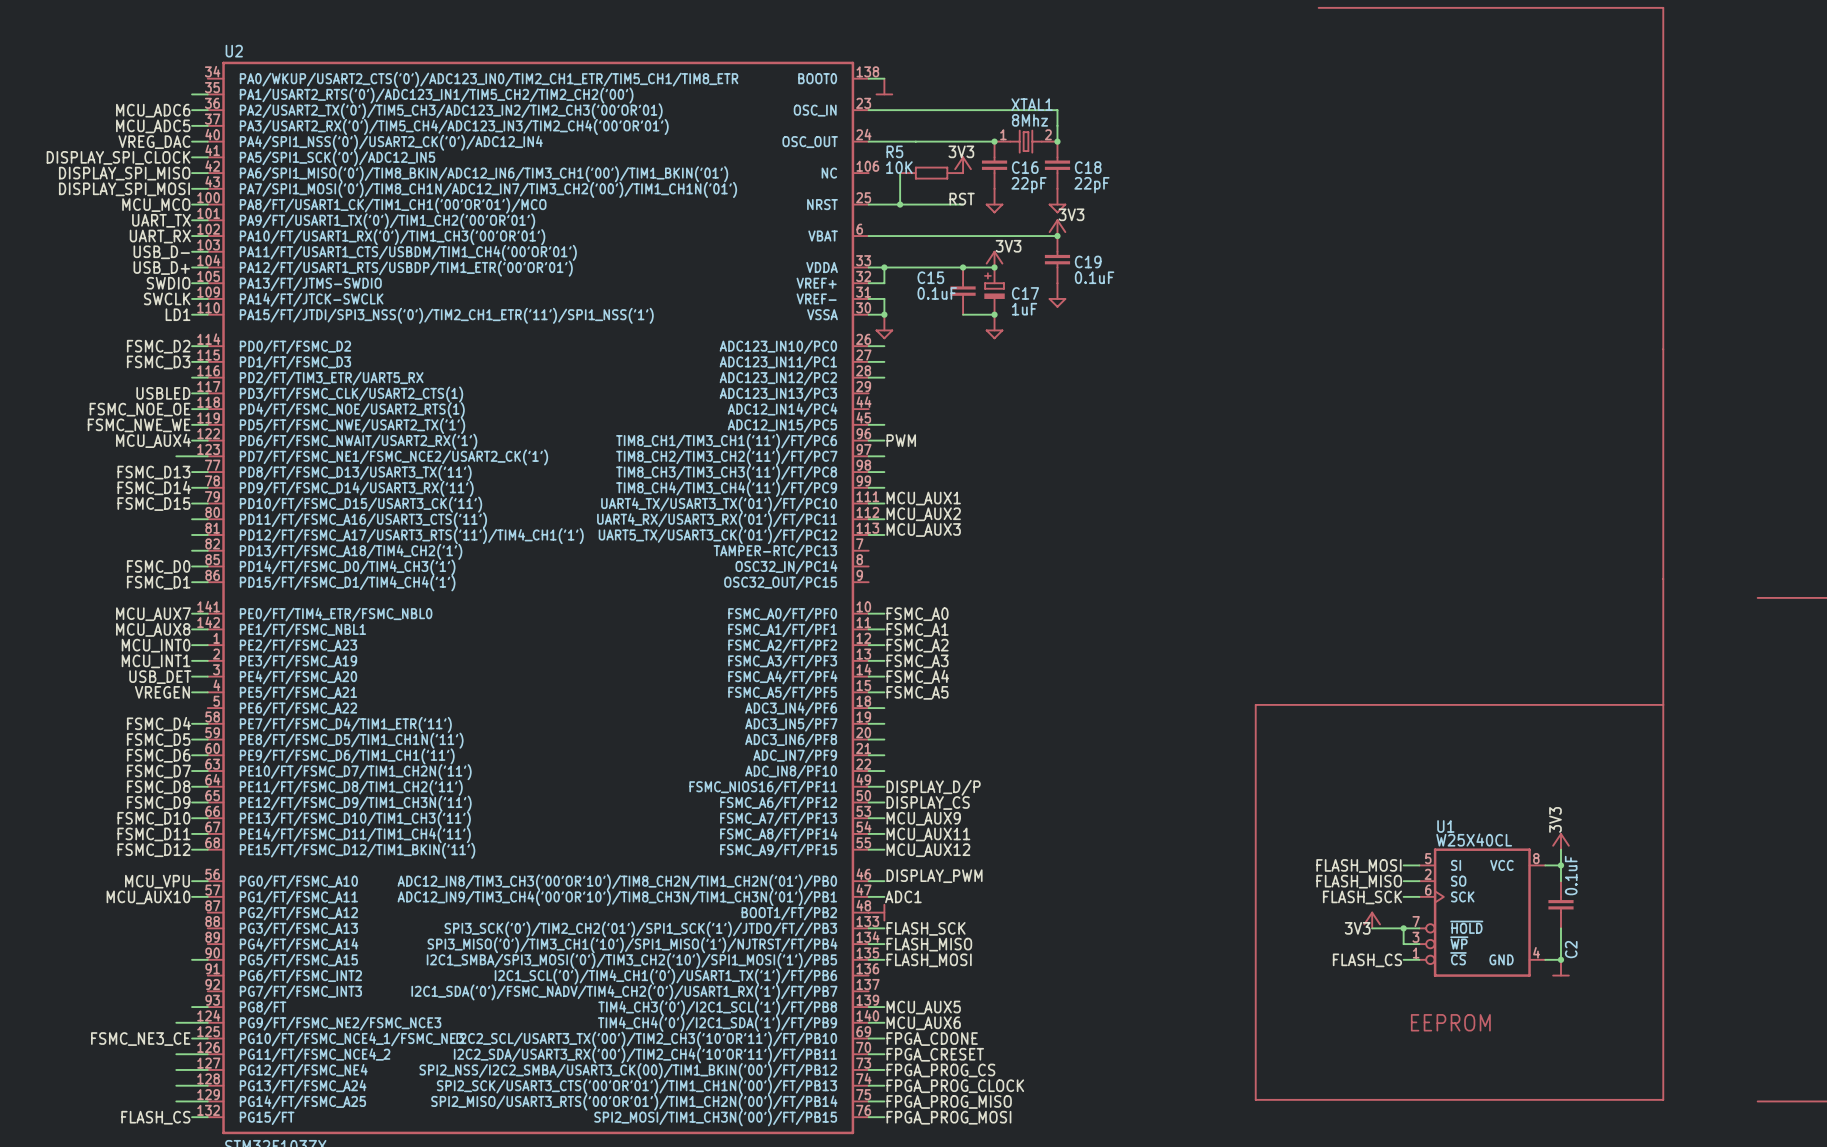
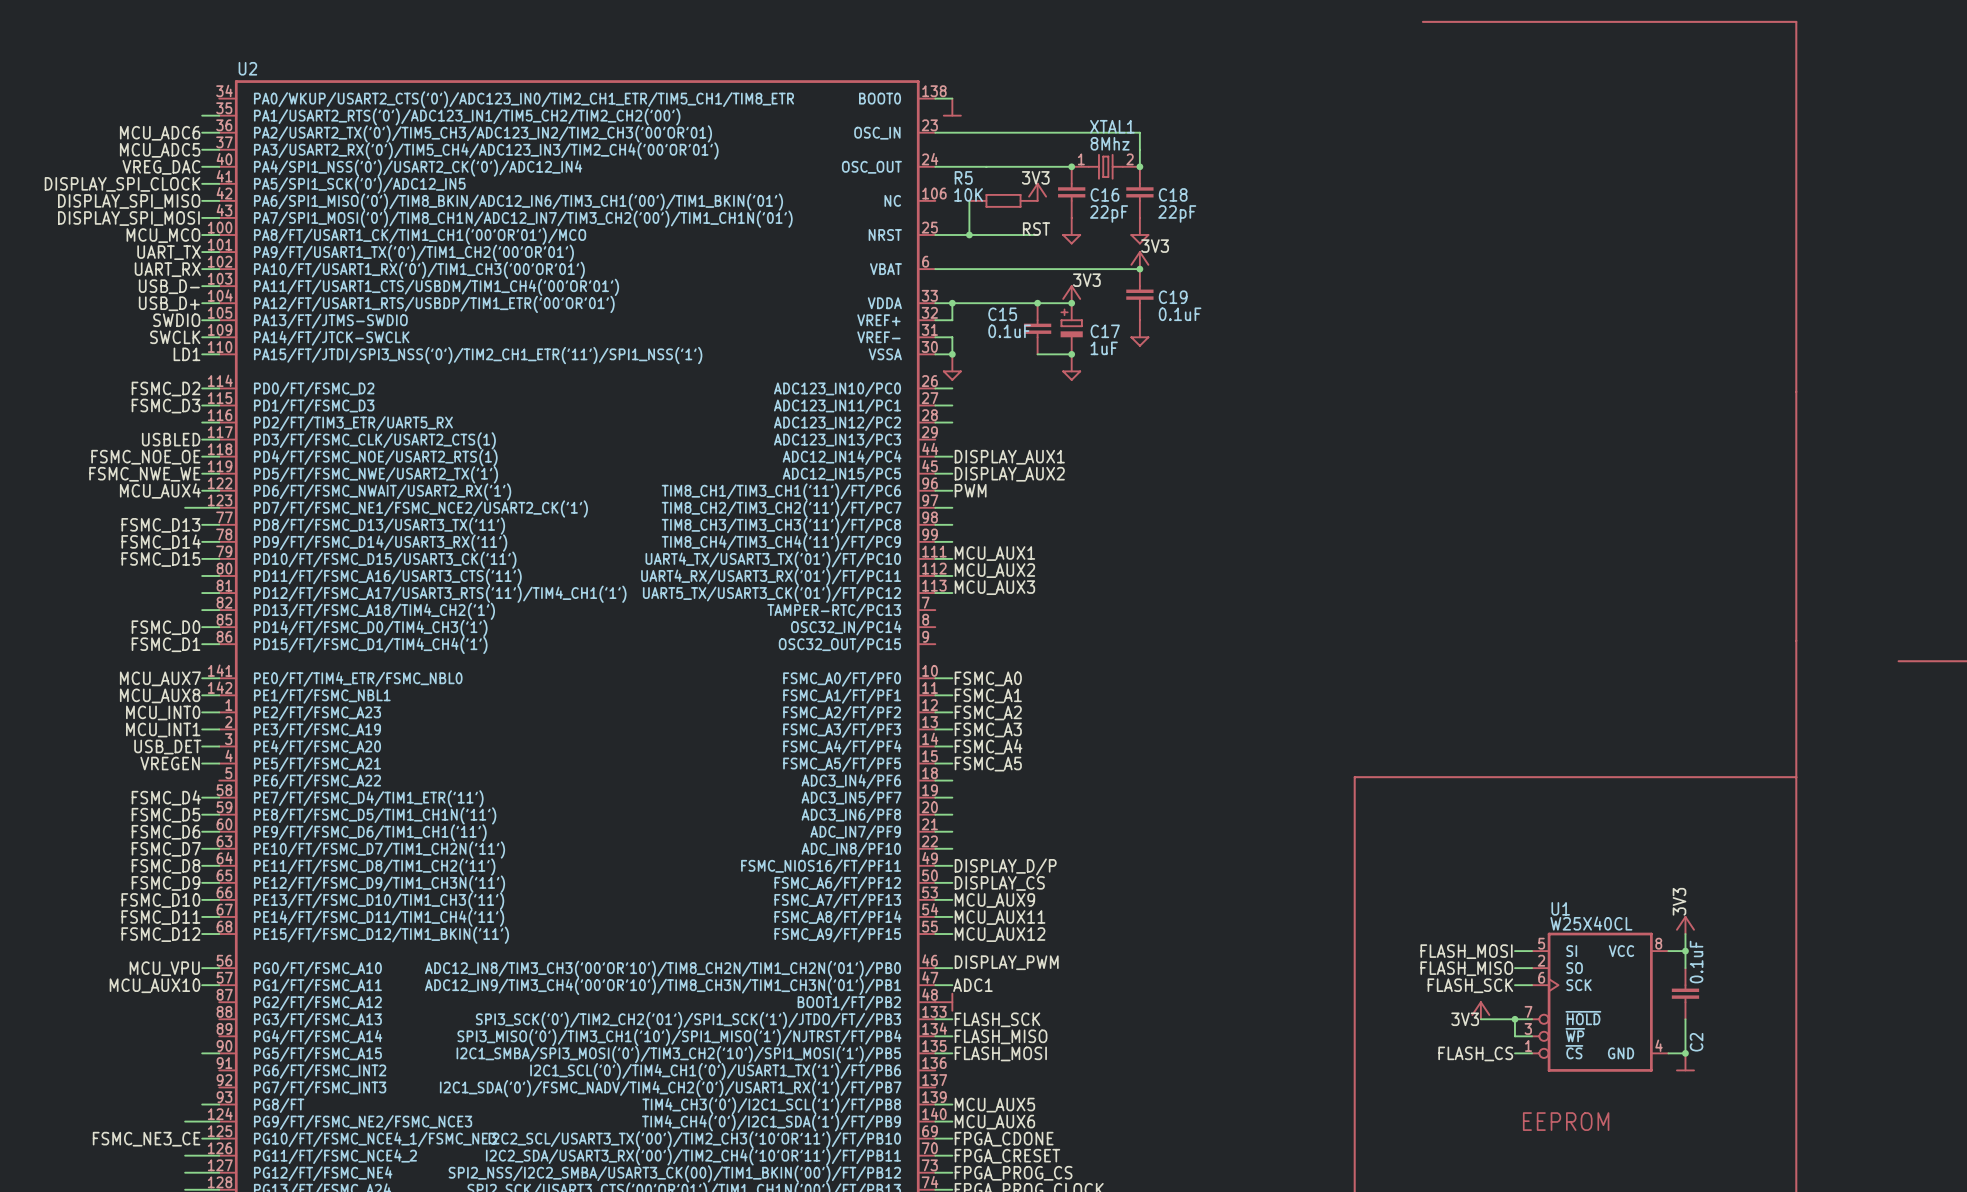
wire: none -> (935, 456) (952, 456)
label: none -> DISPLAY_AUX1 (1009, 457)
label: none -> DISPLAY_AUX2 (1009, 474)

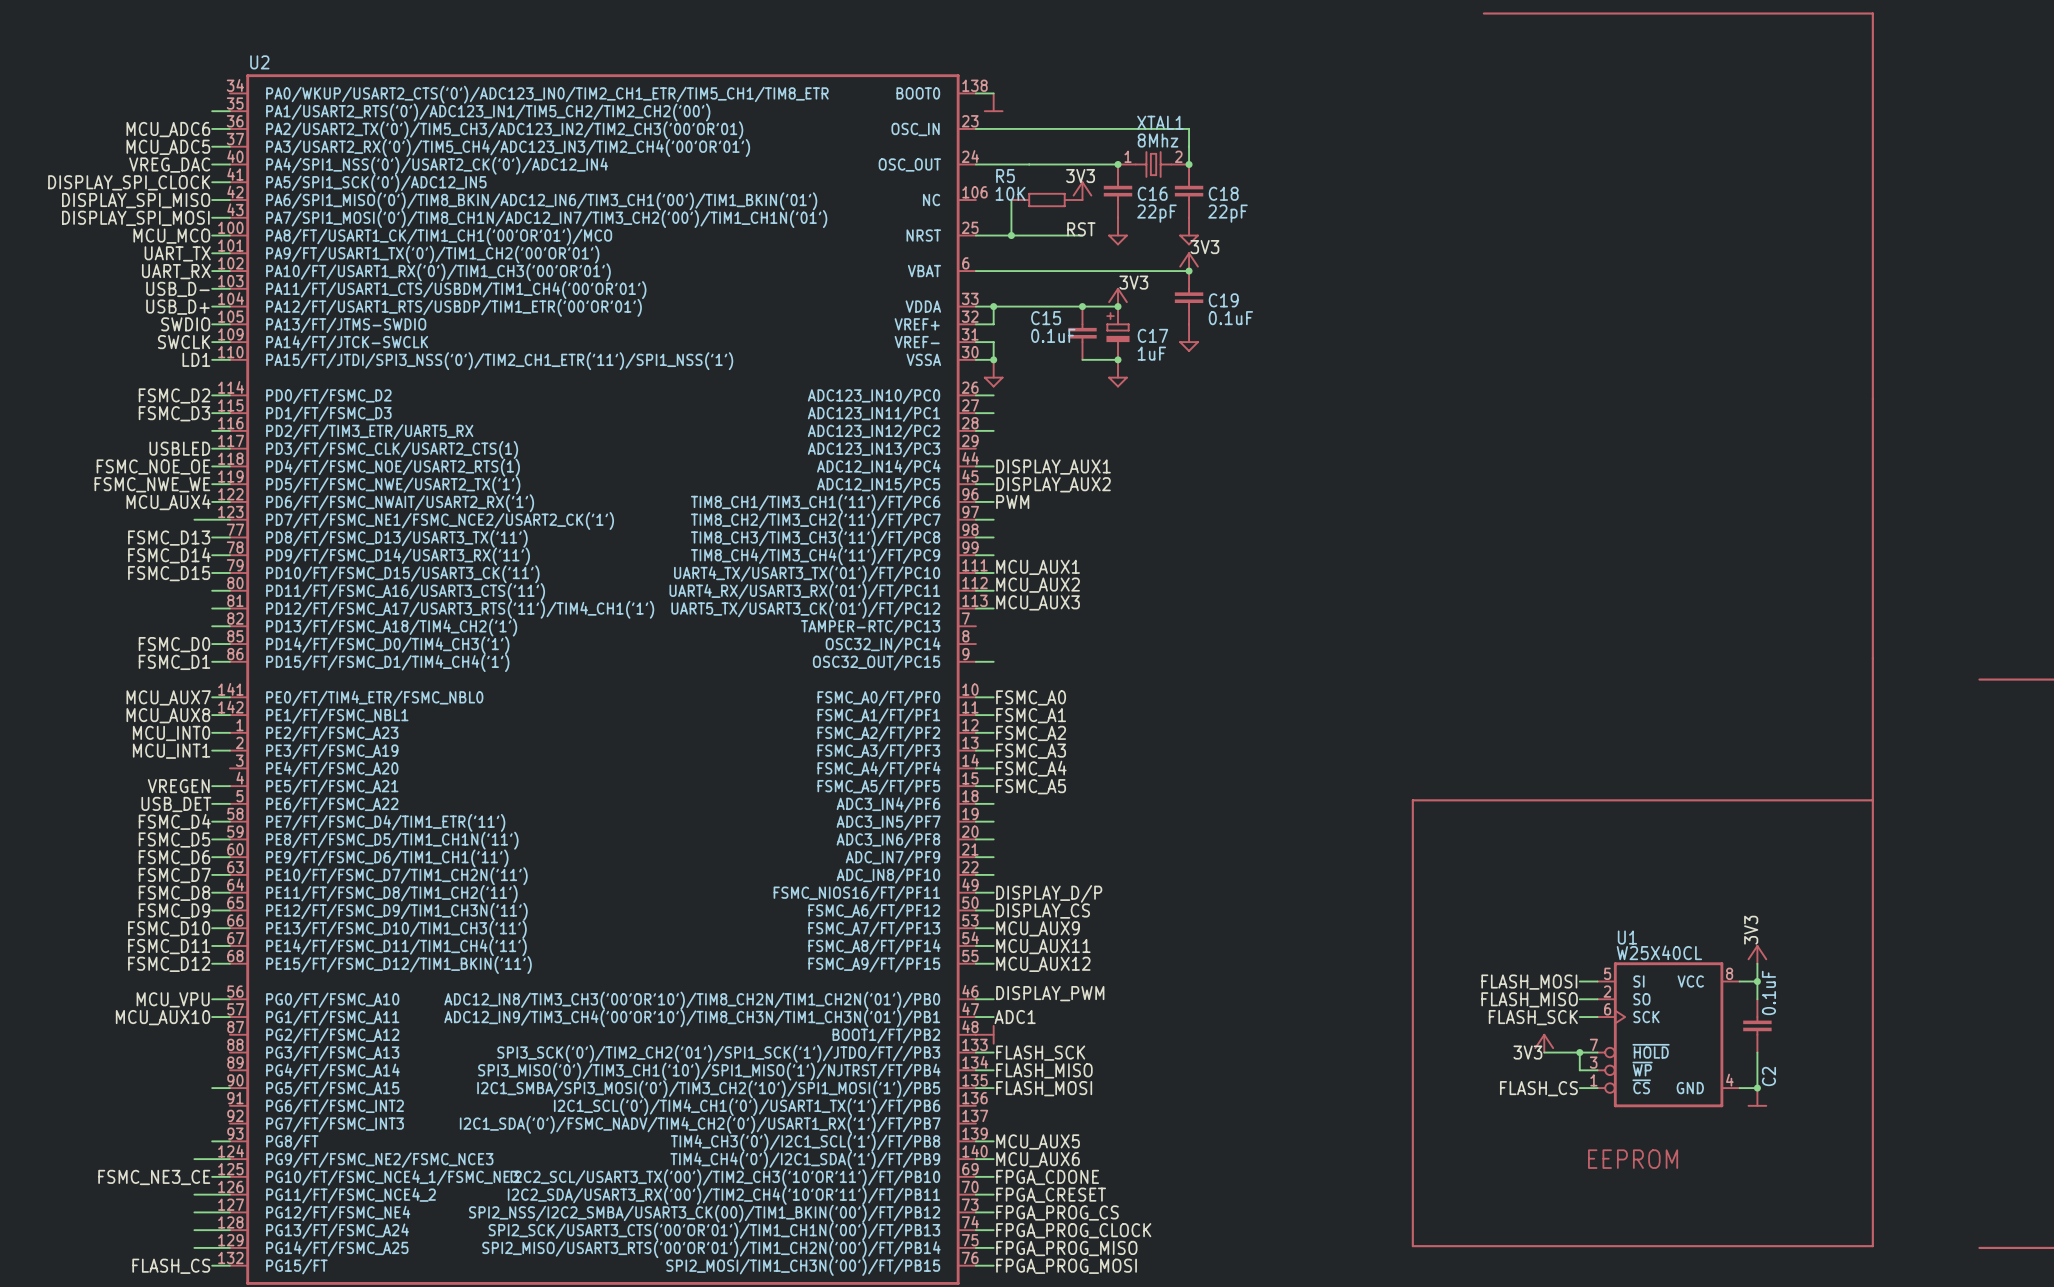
wire: none -> (975, 661) (993, 661)
wire: (202, 746) (219, 746) -> (212, 803) (229, 803)
label position: USB_DET (167, 747) -> USB_DET (176, 804)

